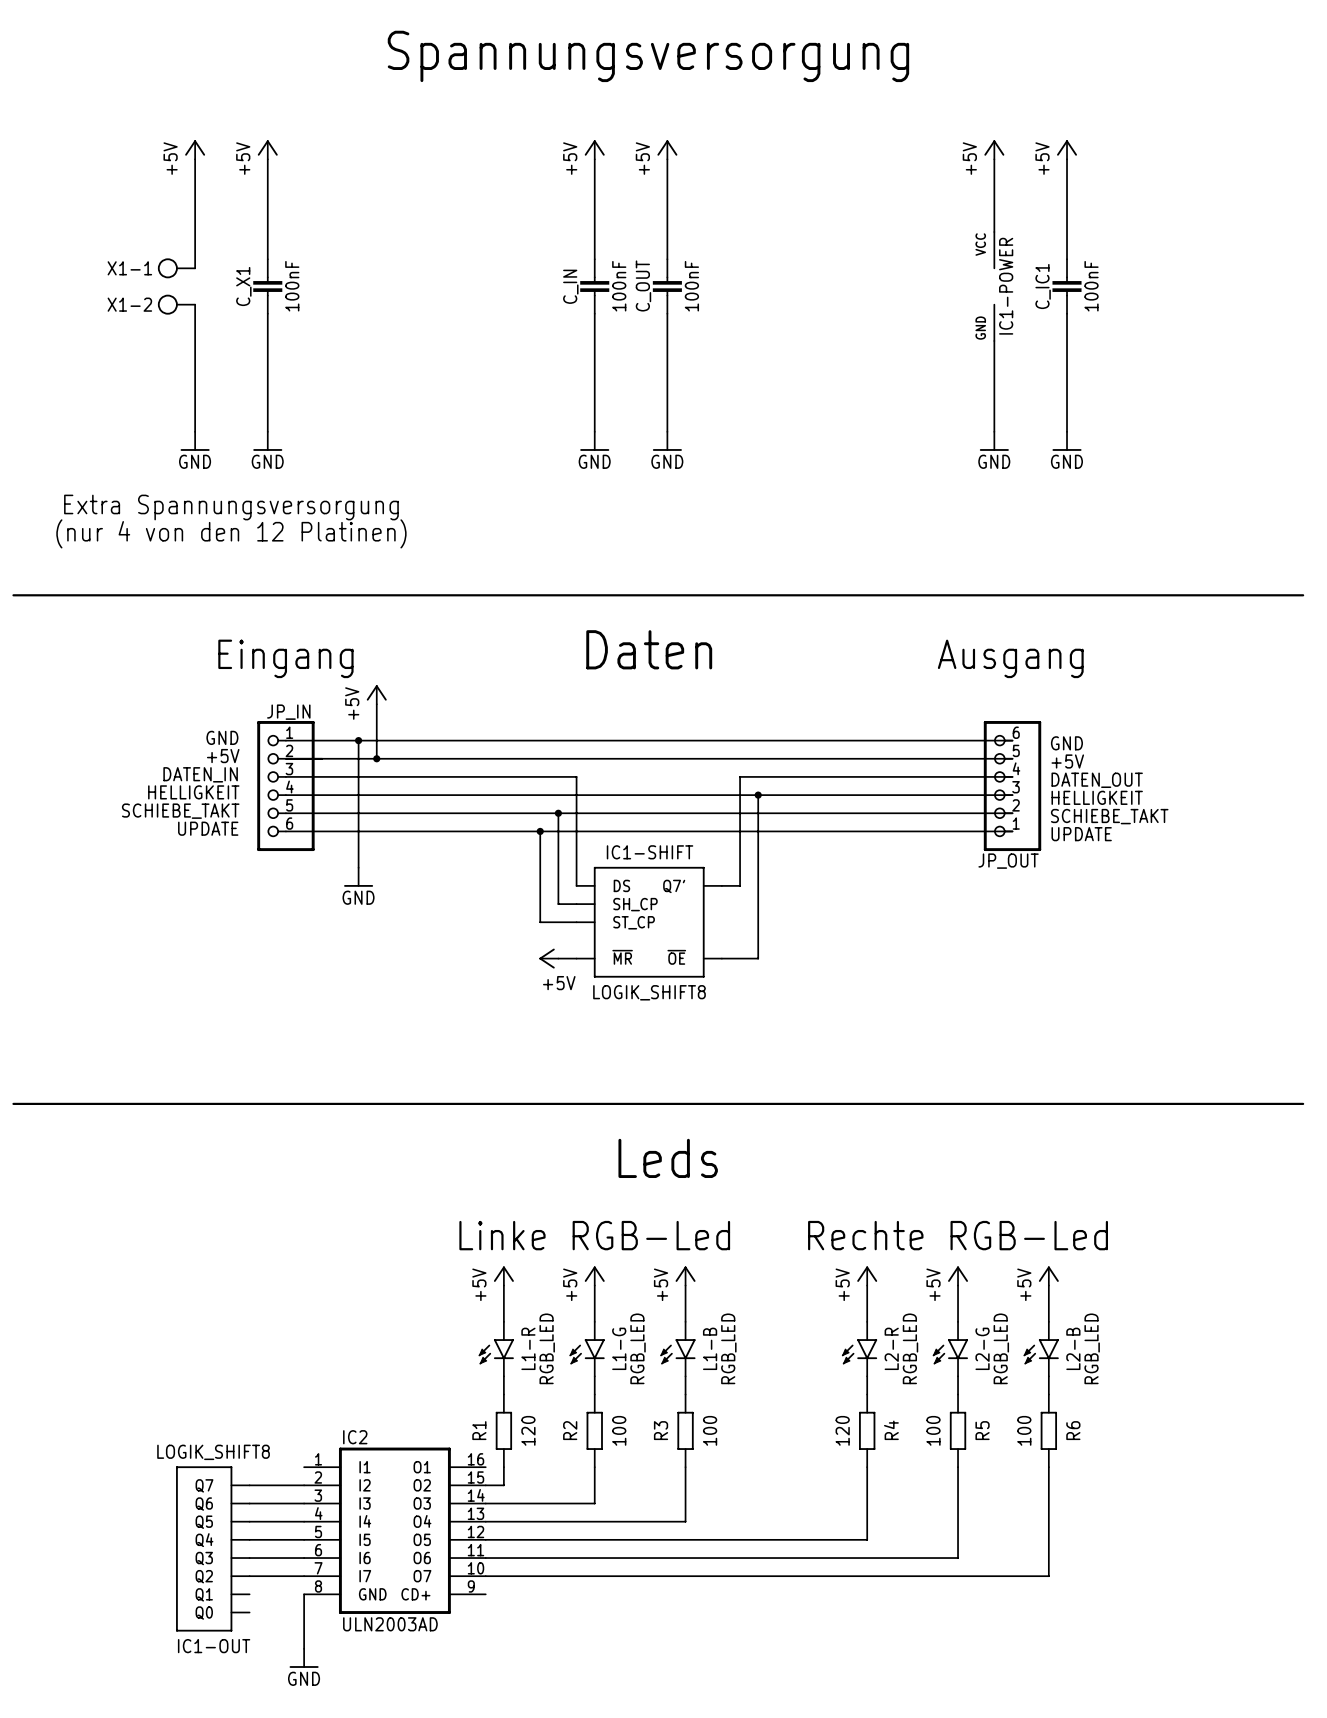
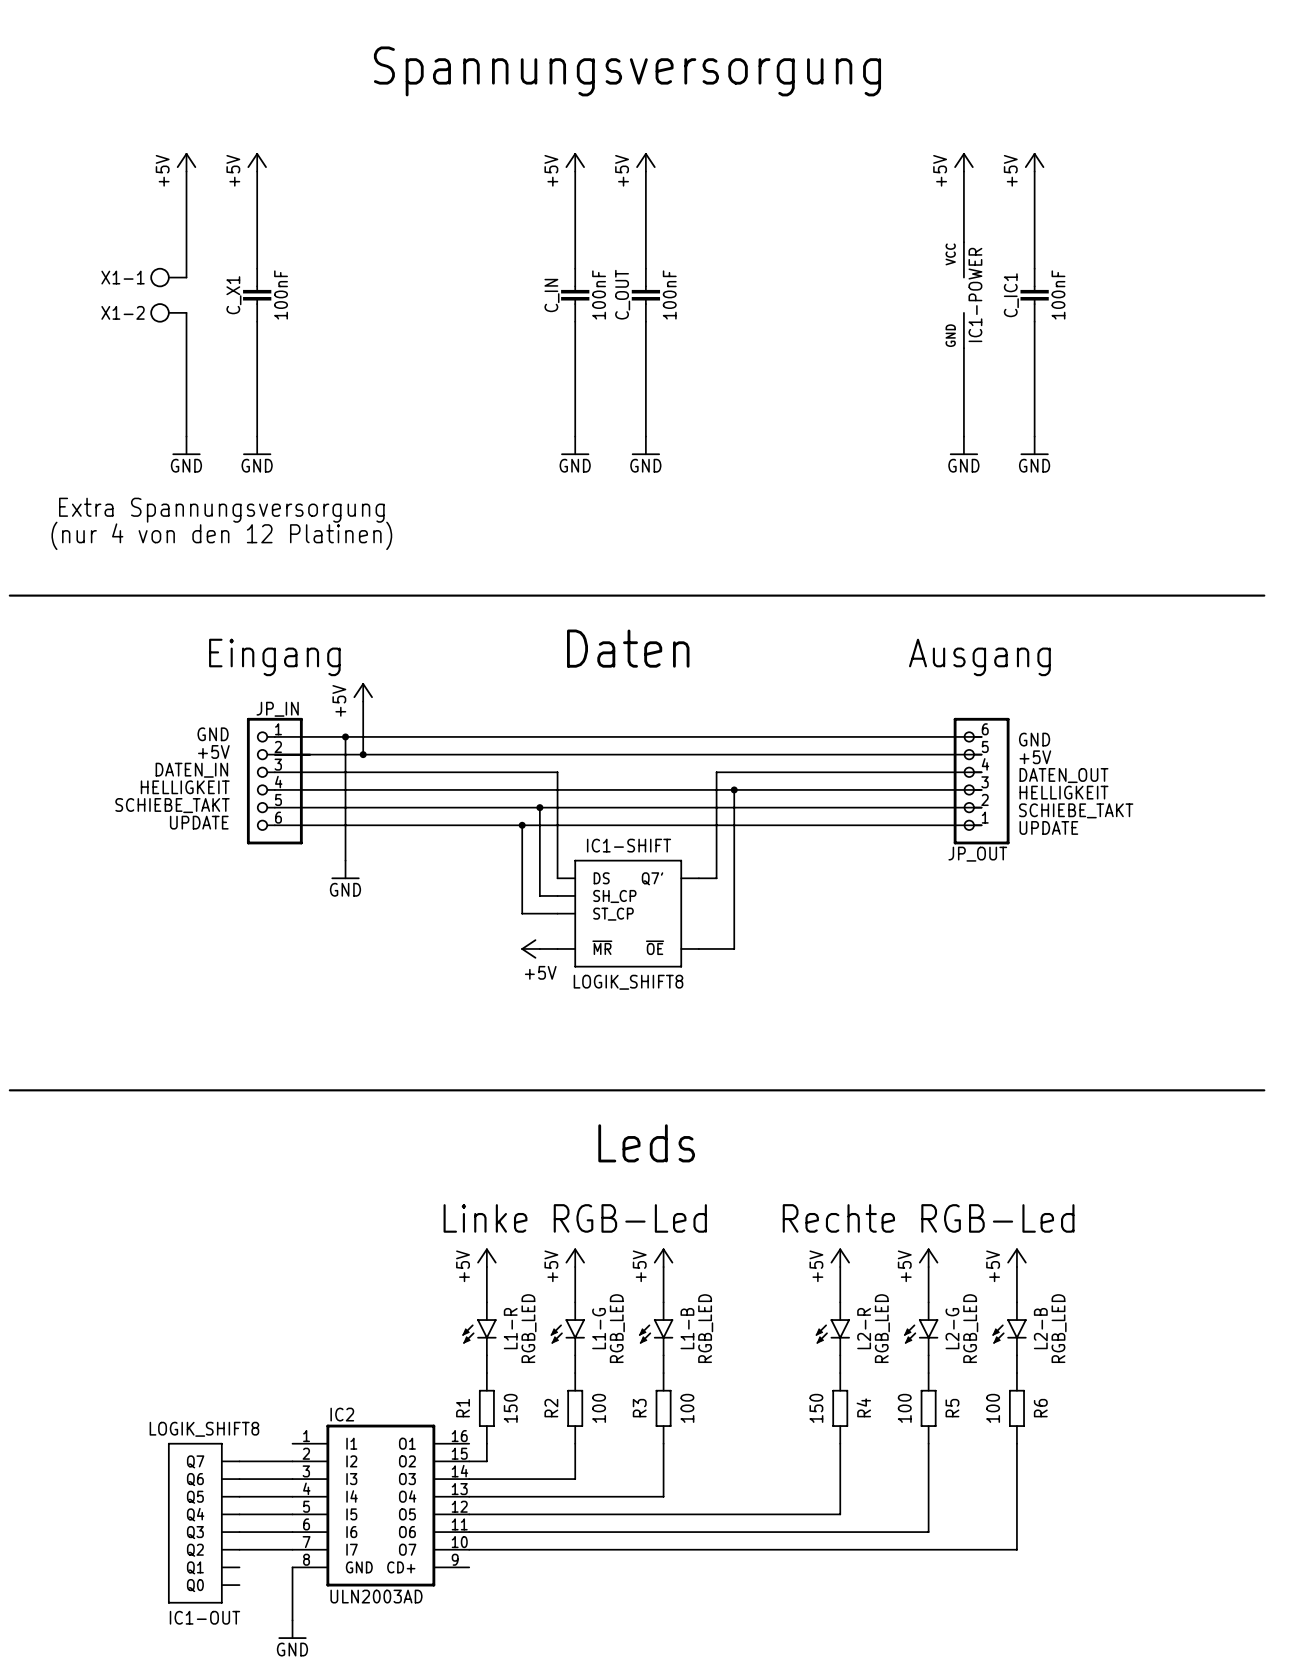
R1 value: 120 (528, 1430) -> 150 (510, 1408)
R4 value: 120 (842, 1430) -> 150 (816, 1408)

